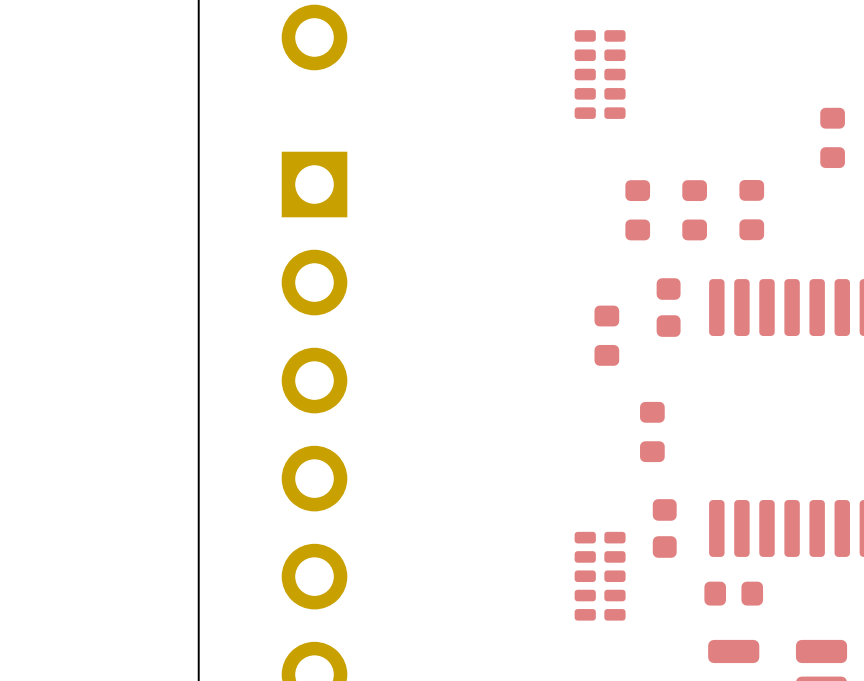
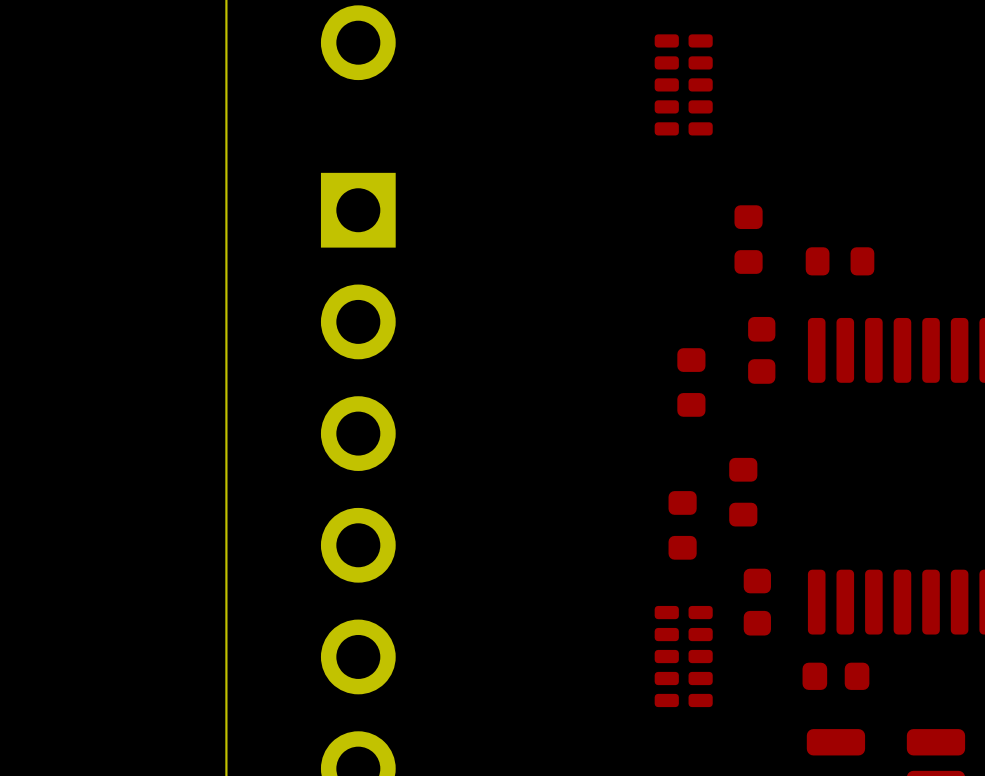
part: (832, 137) -> none
part: (637, 210) -> none
part: none -> (748, 239)
part: (694, 210) -> none
part: (751, 210) -> none
part: none -> (840, 261)
part: none -> (682, 525)

